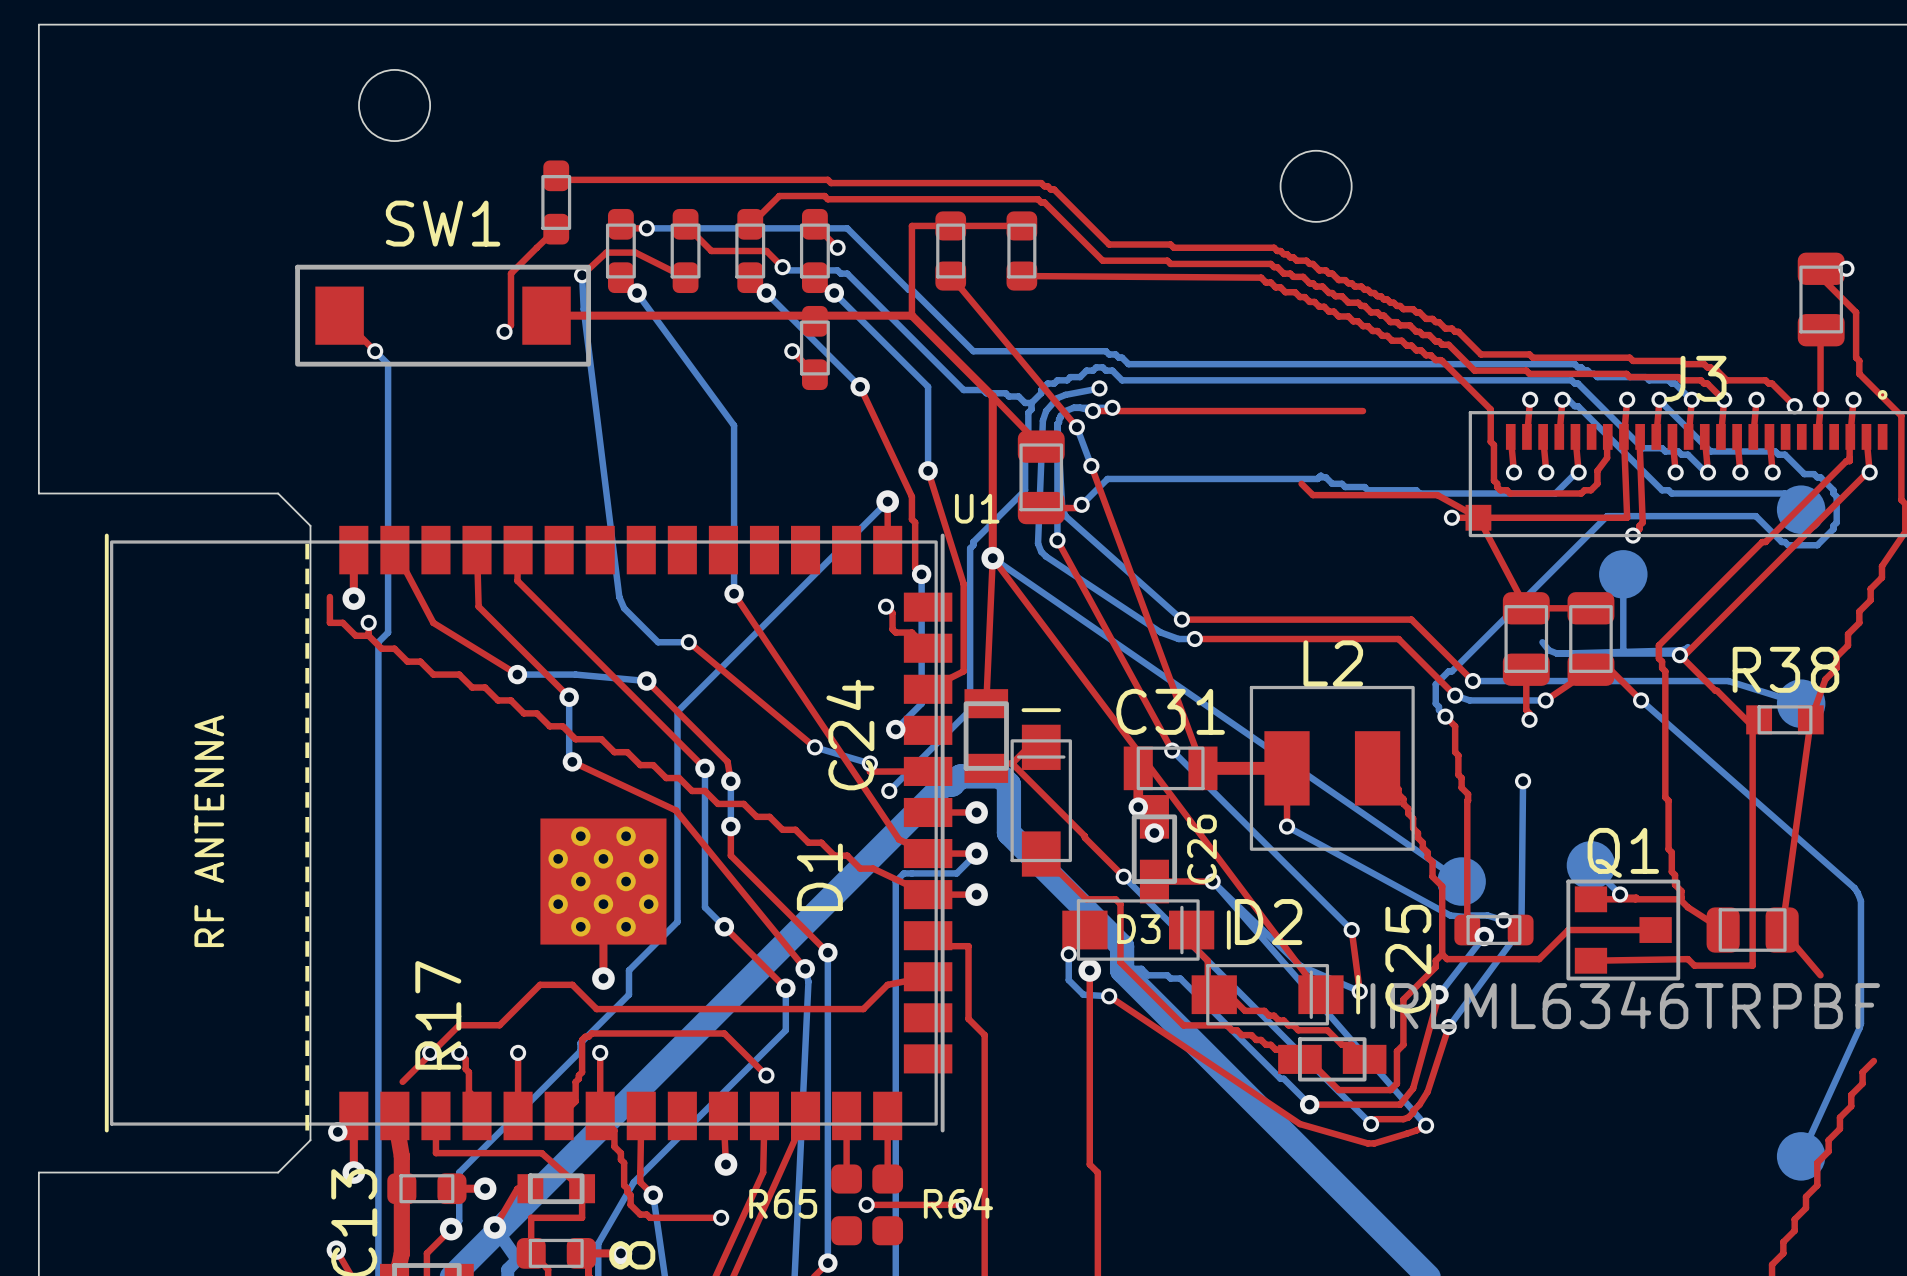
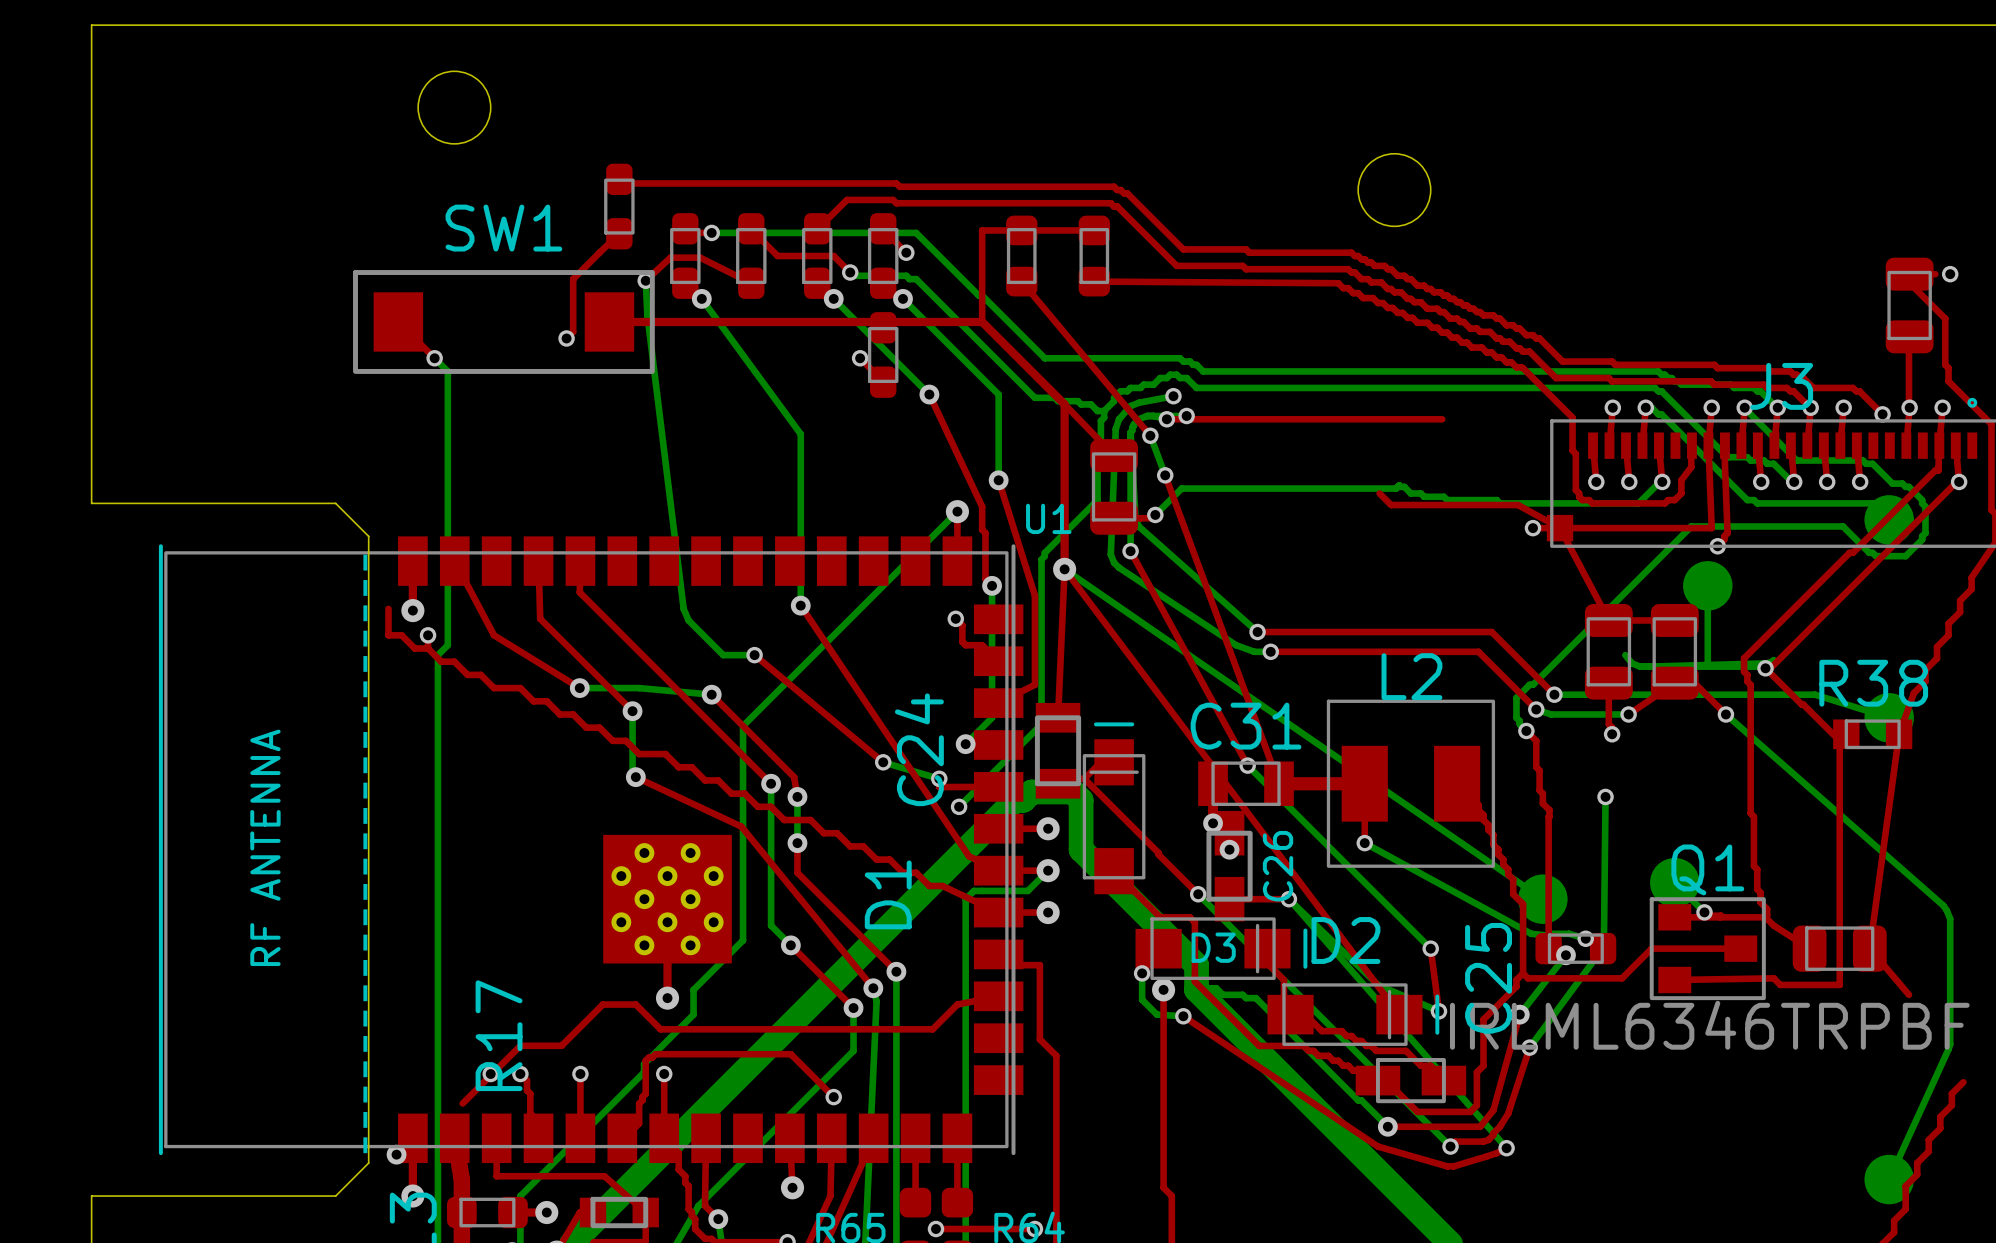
via position: (1846, 268) -> (1950, 274)

